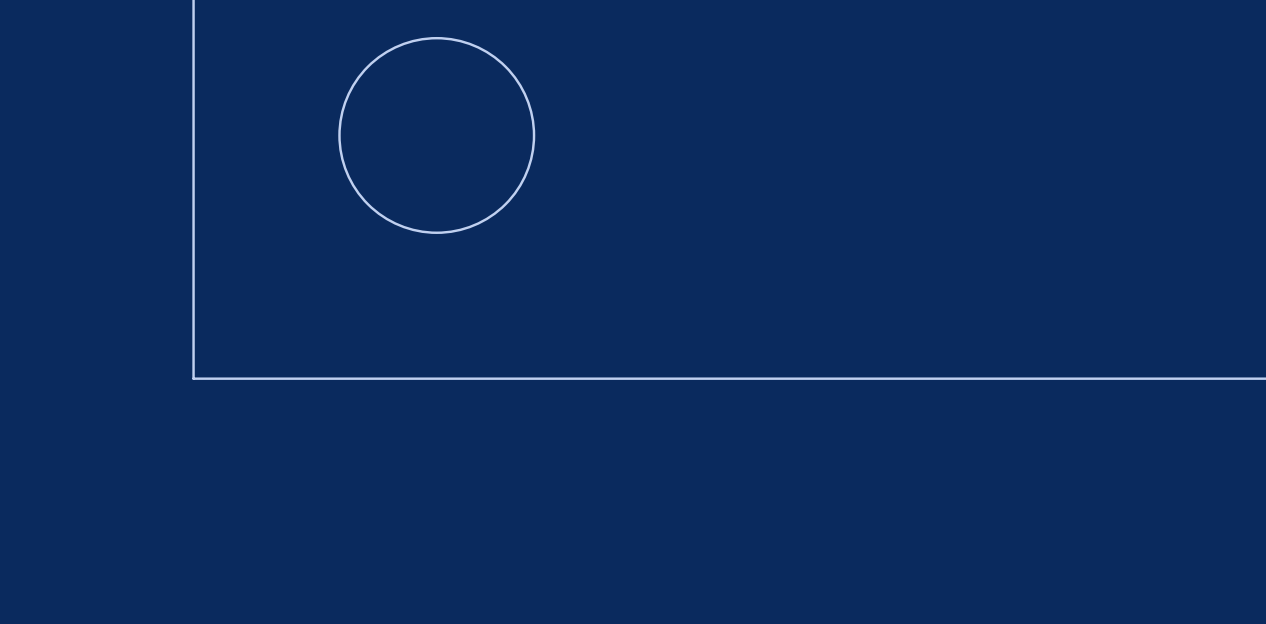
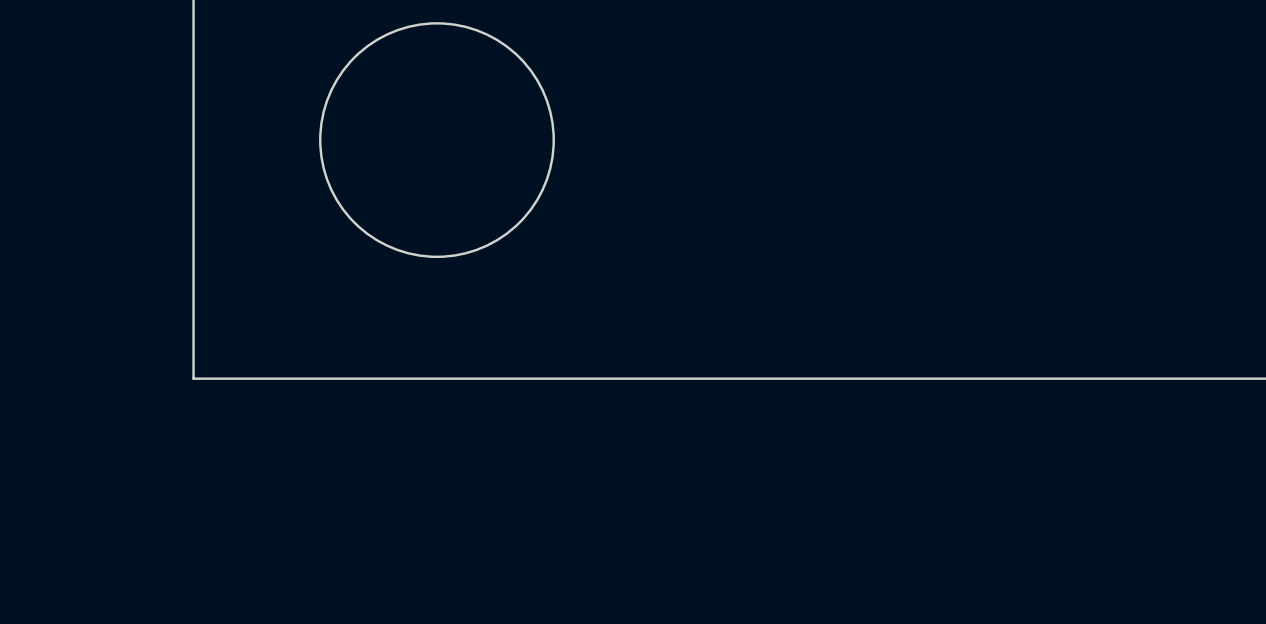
round board edge size: [338, 36, 536, 234] -> [319, 22, 555, 259]

